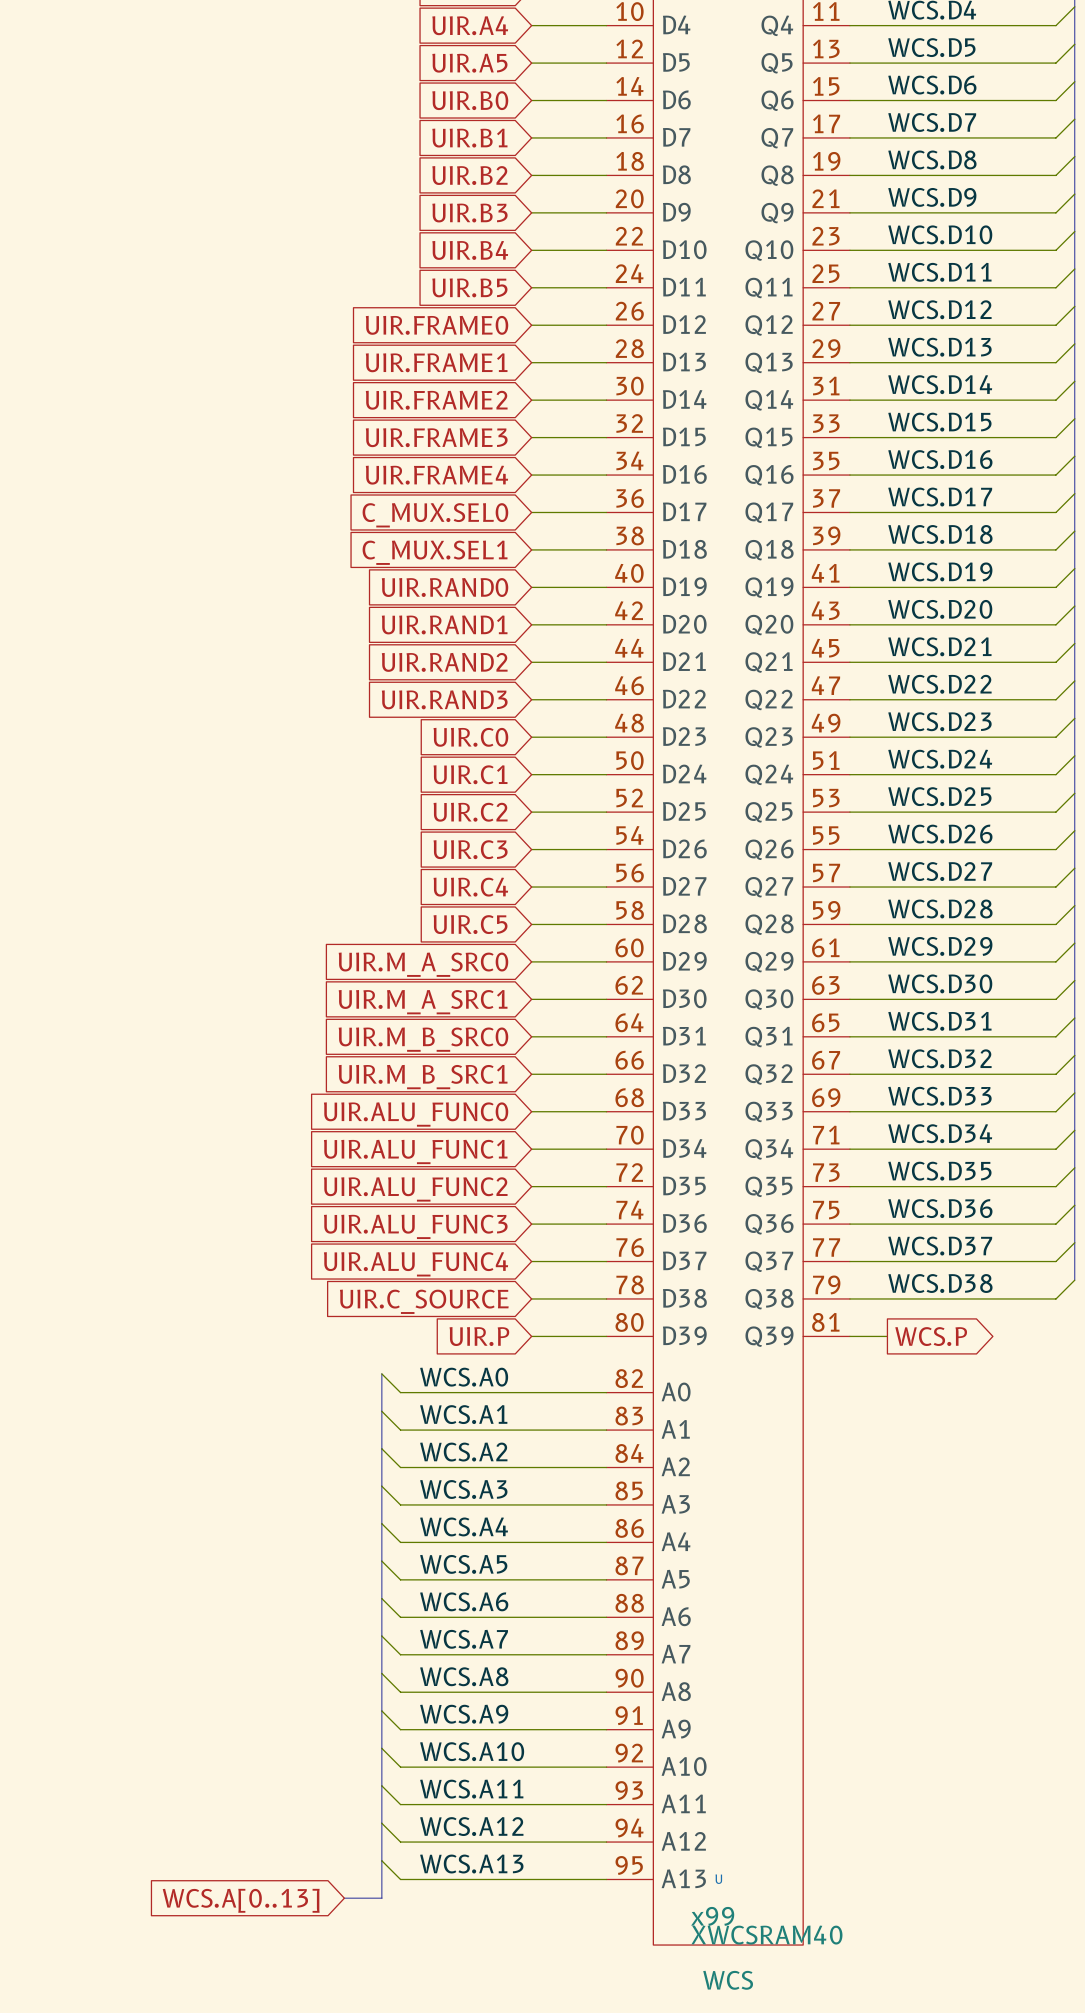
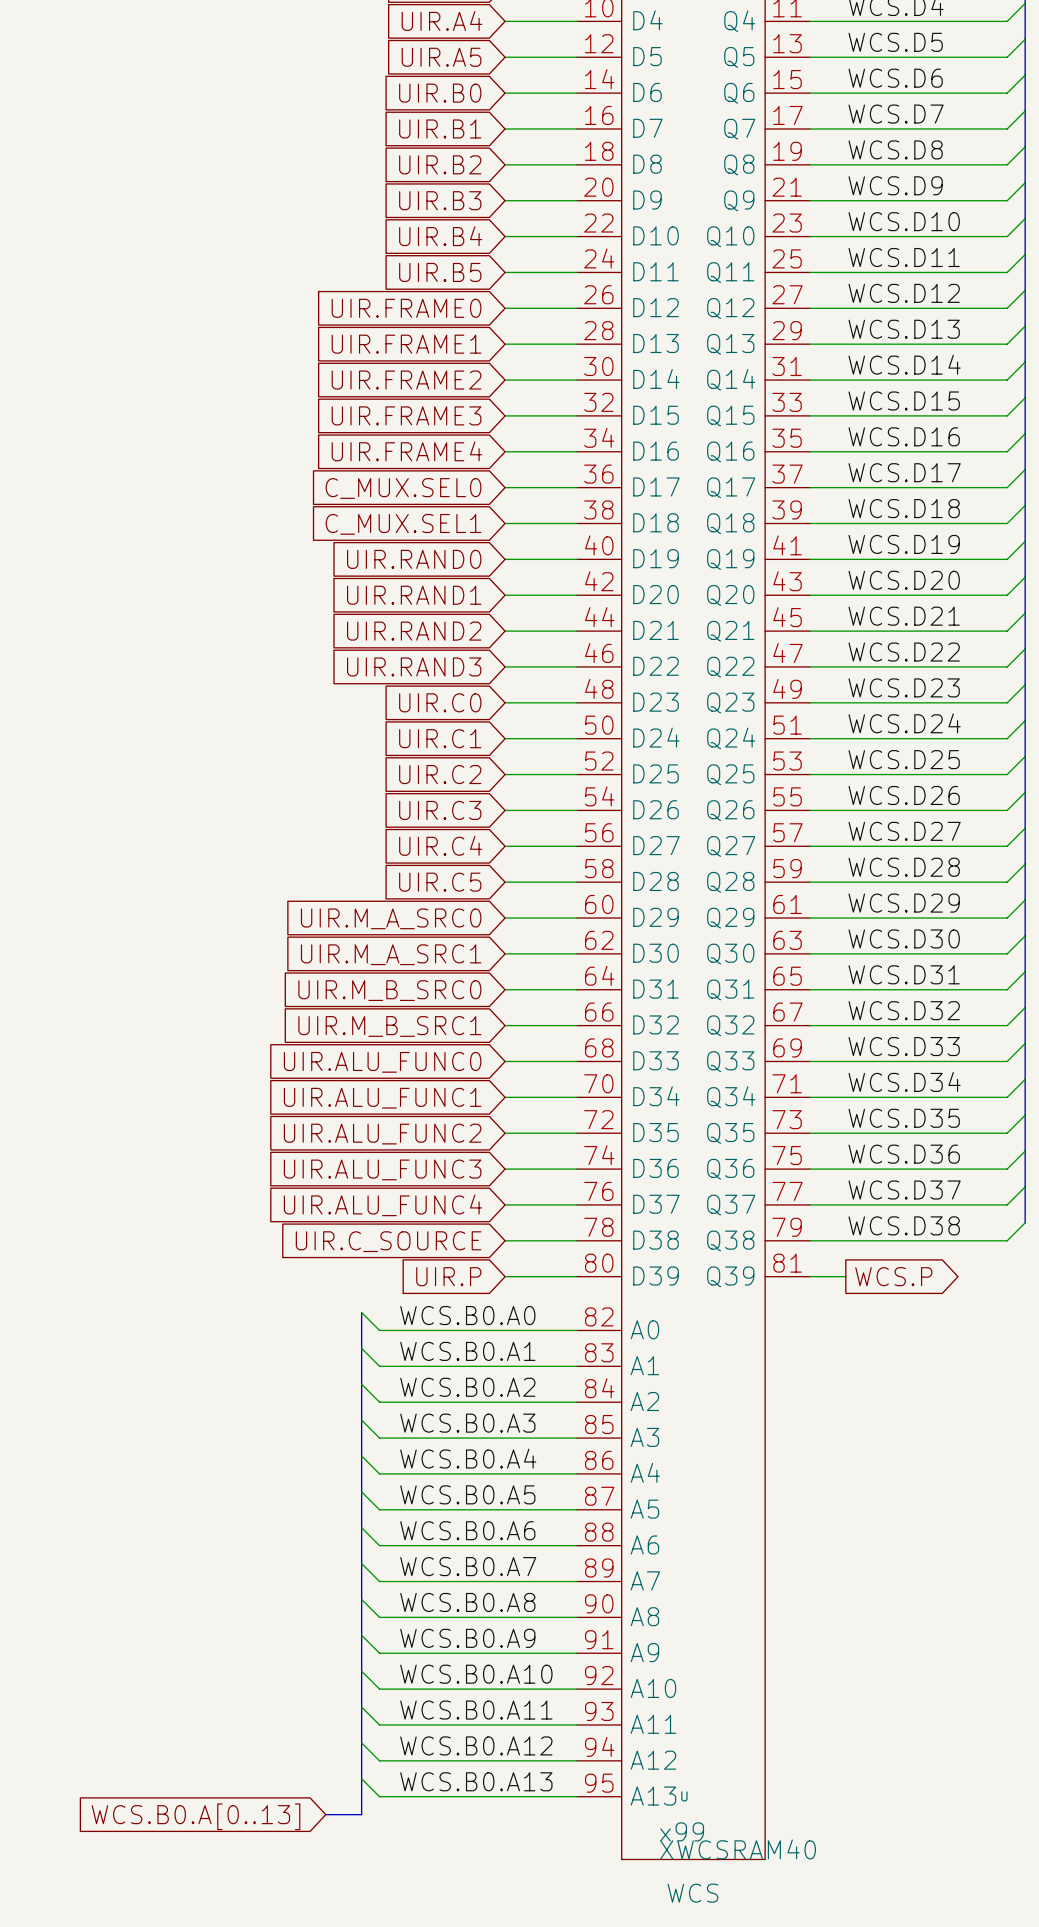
label: WCS.A0 (464, 1377) -> WCS.B0.A0 (467, 1315)
label: WCS.A1 (463, 1414) -> WCS.B0.A1 (467, 1351)
label: WCS.A2 (463, 1452) -> WCS.B0.A2 (467, 1387)
label: WCS.A3 (463, 1489) -> WCS.B0.A3 (467, 1423)
label: WCS.A4 (464, 1526) -> WCS.B0.A4 (468, 1458)
label: WCS.A5 (463, 1564) -> WCS.B0.A5 (467, 1494)
label: WCS.A6 (464, 1601) -> WCS.B0.A6 (467, 1530)
label: WCS.A7 (464, 1639) -> WCS.B0.A7 (468, 1566)
label: WCS.A8 (464, 1676) -> WCS.B0.A8 (467, 1602)
label: WCS.A9 (464, 1714) -> WCS.B0.A9 (467, 1638)
label: WCS.A10 (472, 1751) -> WCS.B0.A10 (476, 1674)
label: WCS.A11 (471, 1789) -> WCS.B0.A11 (476, 1710)
label: WCS.A12 (471, 1826) -> WCS.B0.A12 (476, 1745)
label: WCS.A13 (471, 1864) -> WCS.B0.A13 (476, 1781)
global label: WCS.A[0..13] (241, 1900) -> WCS.B0.A[0..13] (196, 1816)

